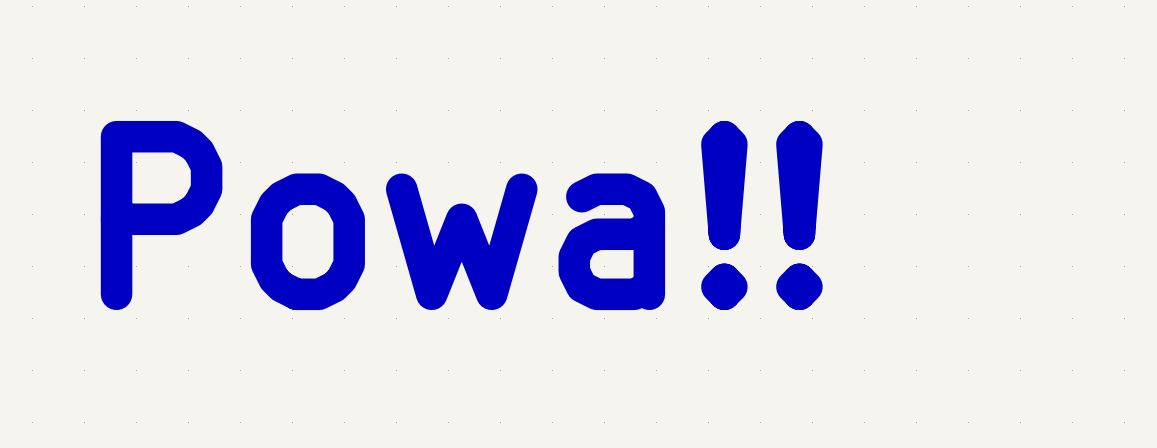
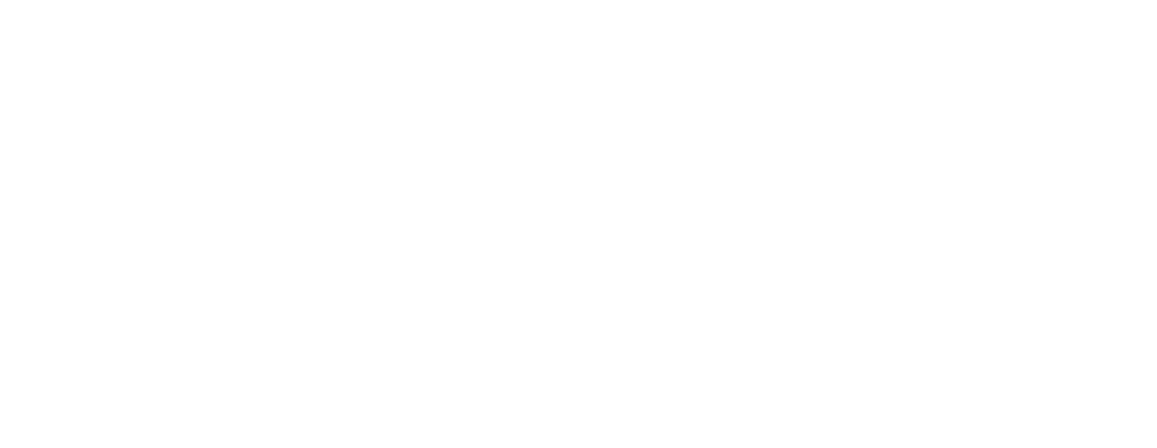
text: Powa!! (461, 215) -> none

